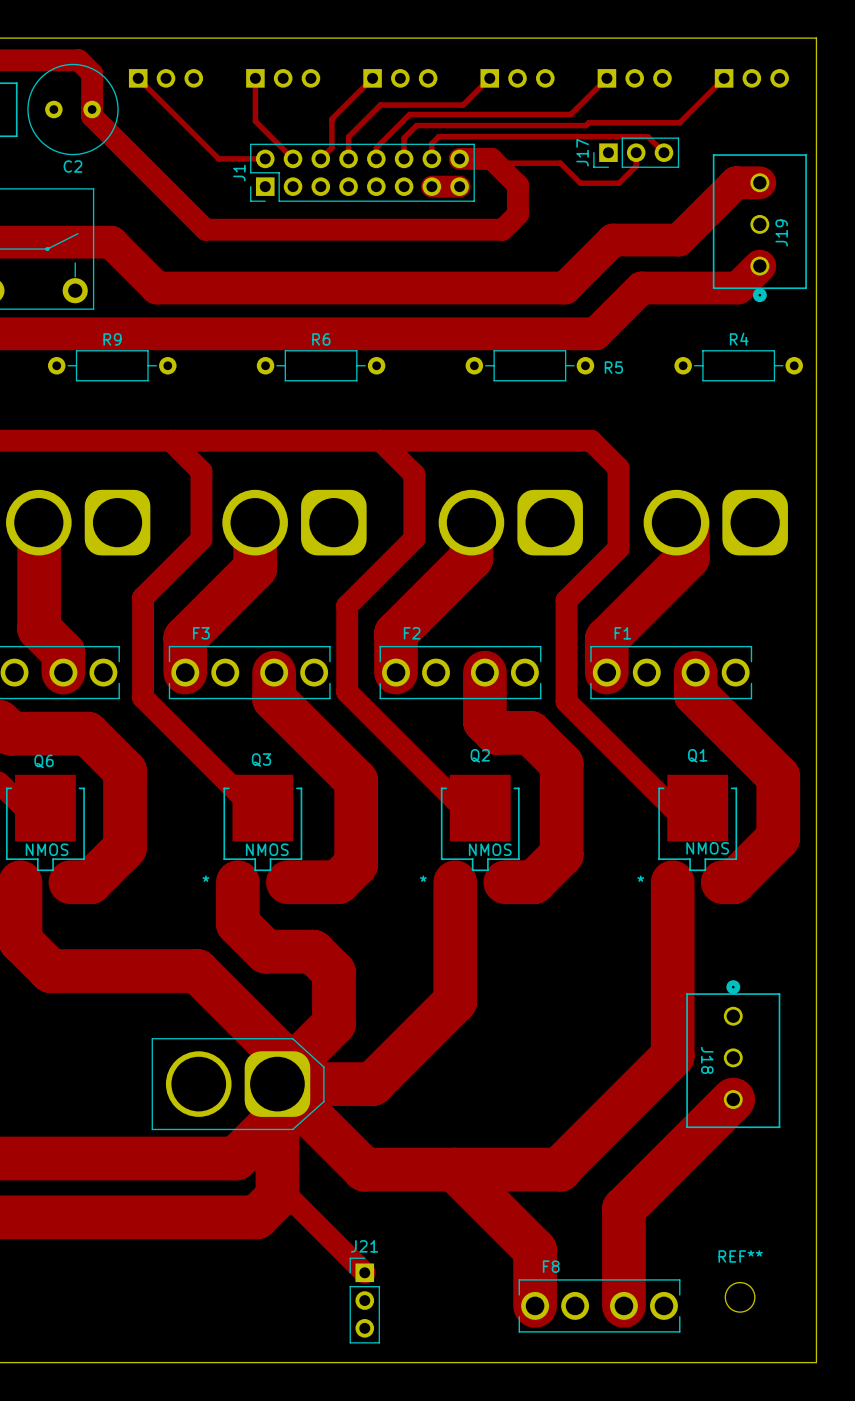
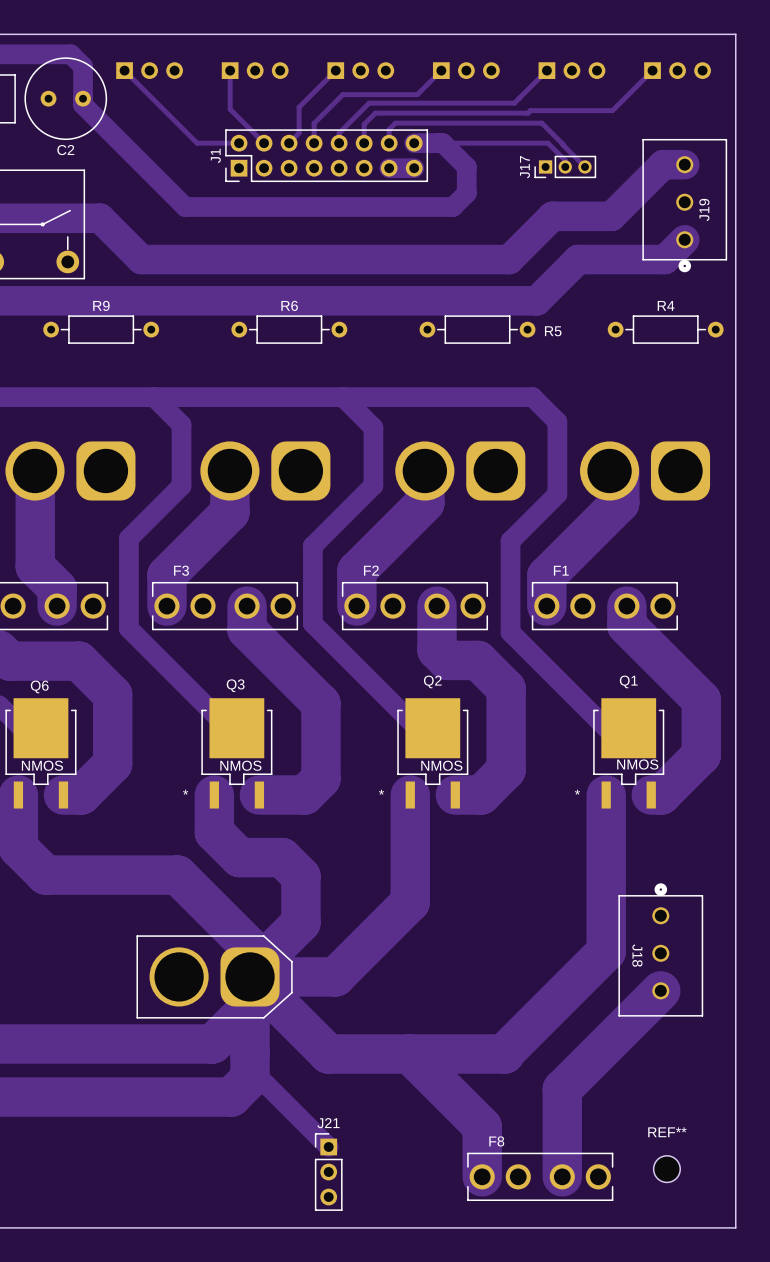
track: (601, 136) (647, 136) (663, 152) -> (541, 123) (584, 166)
J17 footprint: [593, 137, 680, 168] -> [534, 155, 597, 178]
track: (636, 152) (636, 166) (619, 183) (580, 183) (560, 163) (495, 163) (491, 158) -> none
track: none -> (437, 143) (547, 143) (565, 160) (565, 166)

